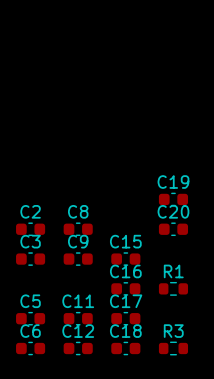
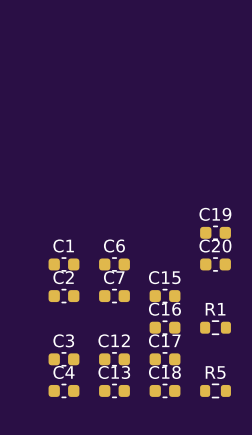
C2 name: C2 (30, 211) -> C1 (63, 245)
C8 name: C8 (78, 211) -> C6 (114, 245)
C3 name: C3 (30, 241) -> C2 (63, 277)
C9 name: C9 (78, 241) -> C7 (114, 277)
C5 name: C5 (30, 301) -> C3 (63, 340)
C11 name: C11 (78, 301) -> C12 (114, 340)
C6 name: C6 (30, 331) -> C4 (63, 372)
C12 name: C12 (78, 331) -> C13 (114, 372)
R3 name: R3 (173, 331) -> R5 (215, 372)

